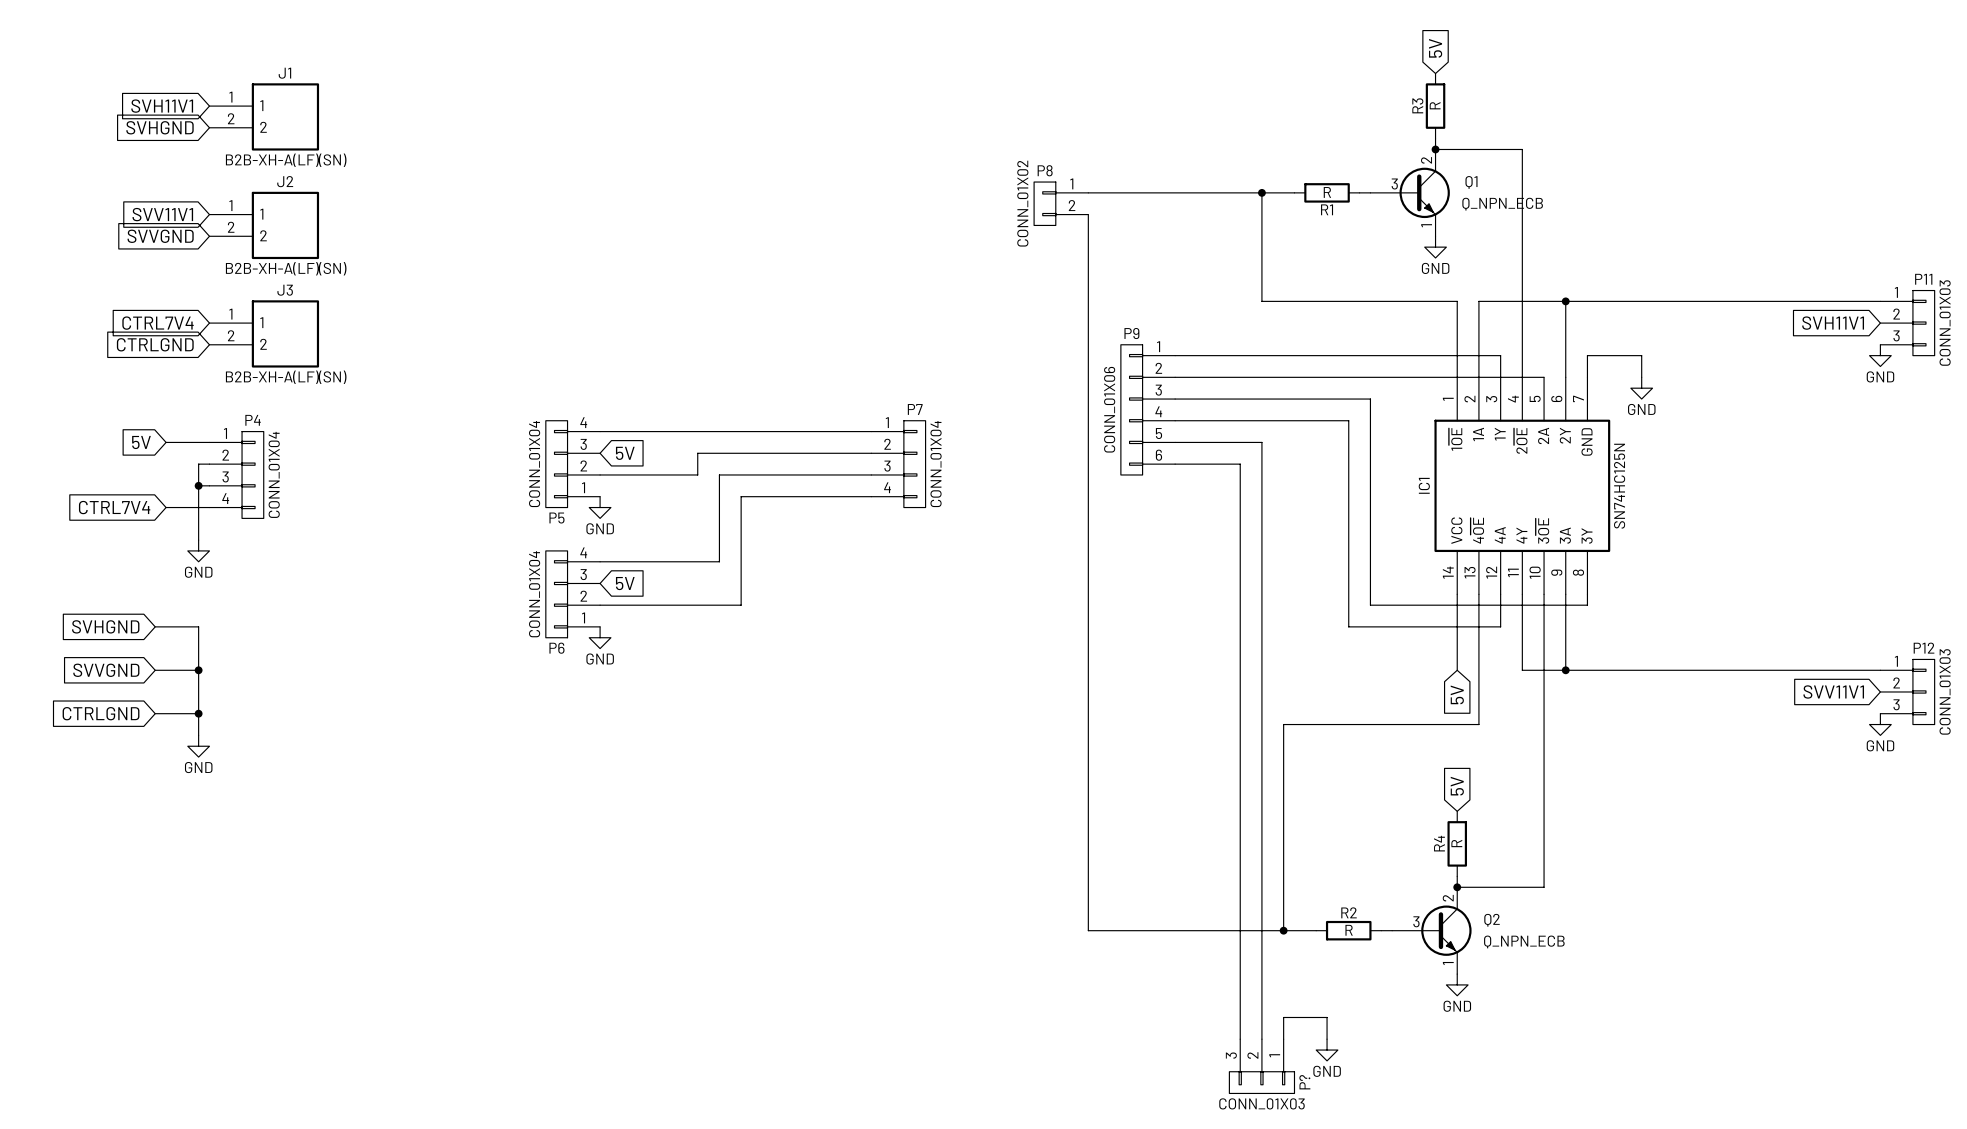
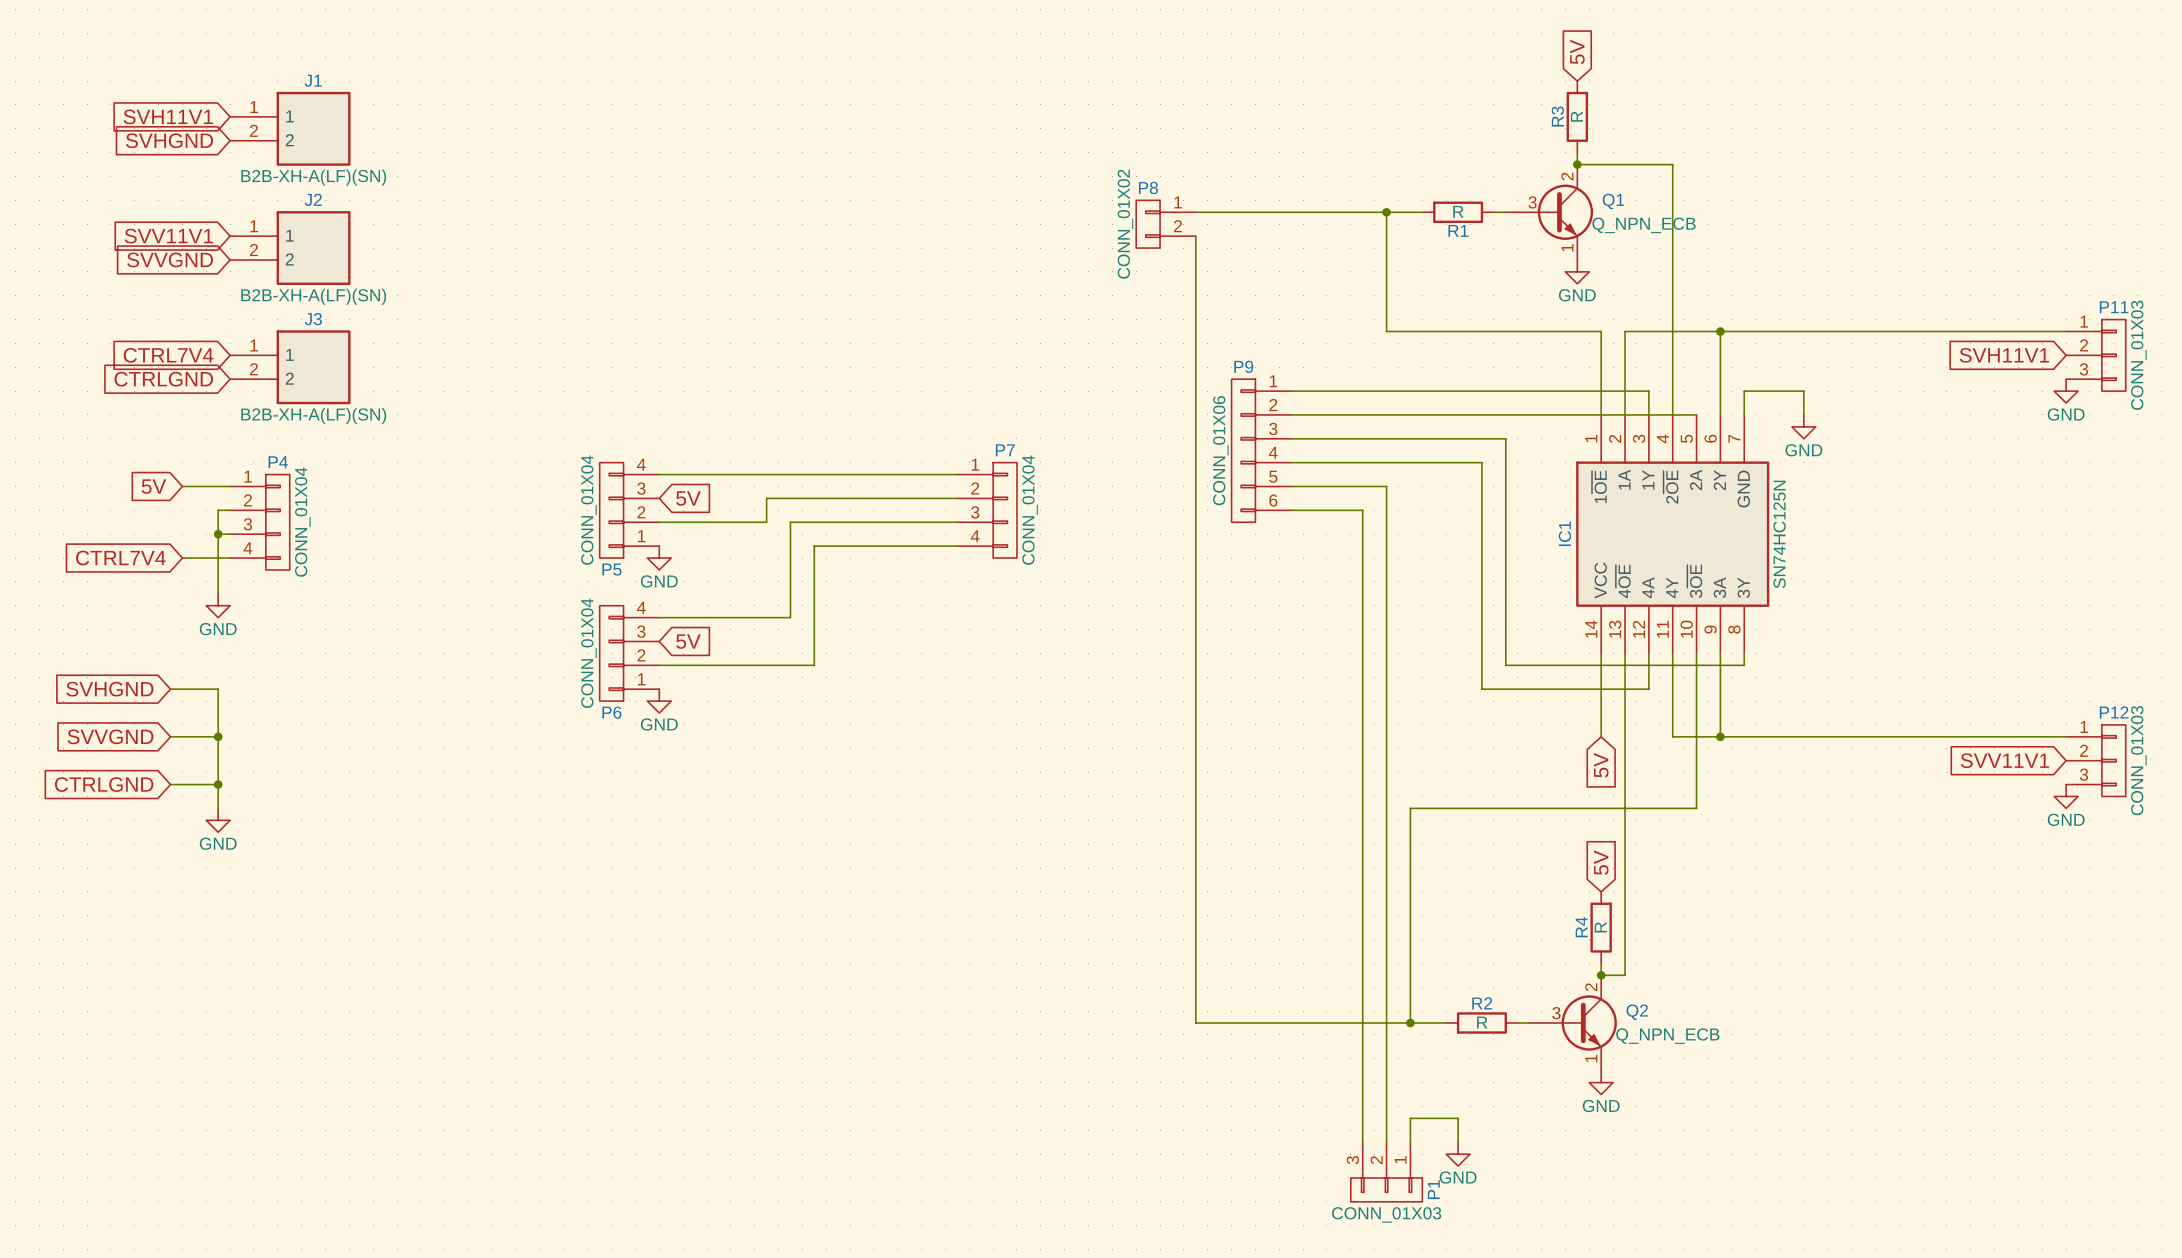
wire: (1478, 724) (1283, 724) (1283, 735) -> (1696, 808) (1410, 808)
wire: (1544, 735) (1544, 887) (1478, 887) -> (1625, 796) (1625, 975)
P? name: P? (1304, 1082) -> P1 (1433, 1189)

